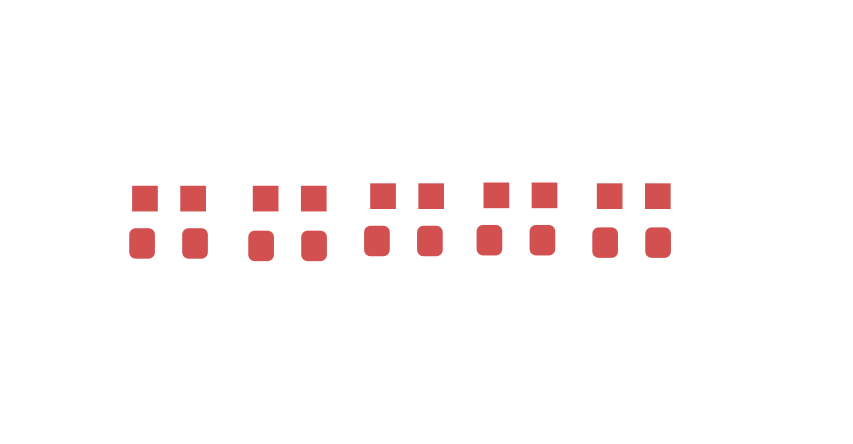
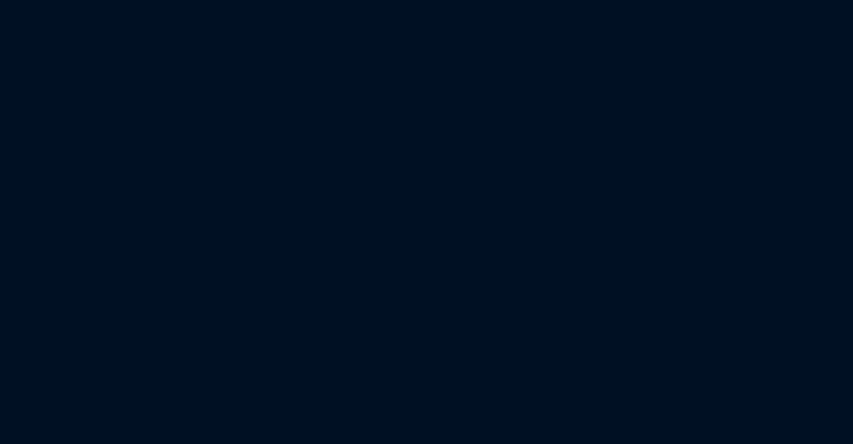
part: (520, 195) -> none
part: (407, 196) -> none
part: (633, 196) -> none
part: (169, 198) -> none
part: (289, 198) -> none
part: (515, 240) -> none
part: (403, 241) -> none
part: (631, 242) -> none
part: (168, 243) -> none
part: (287, 245) -> none

